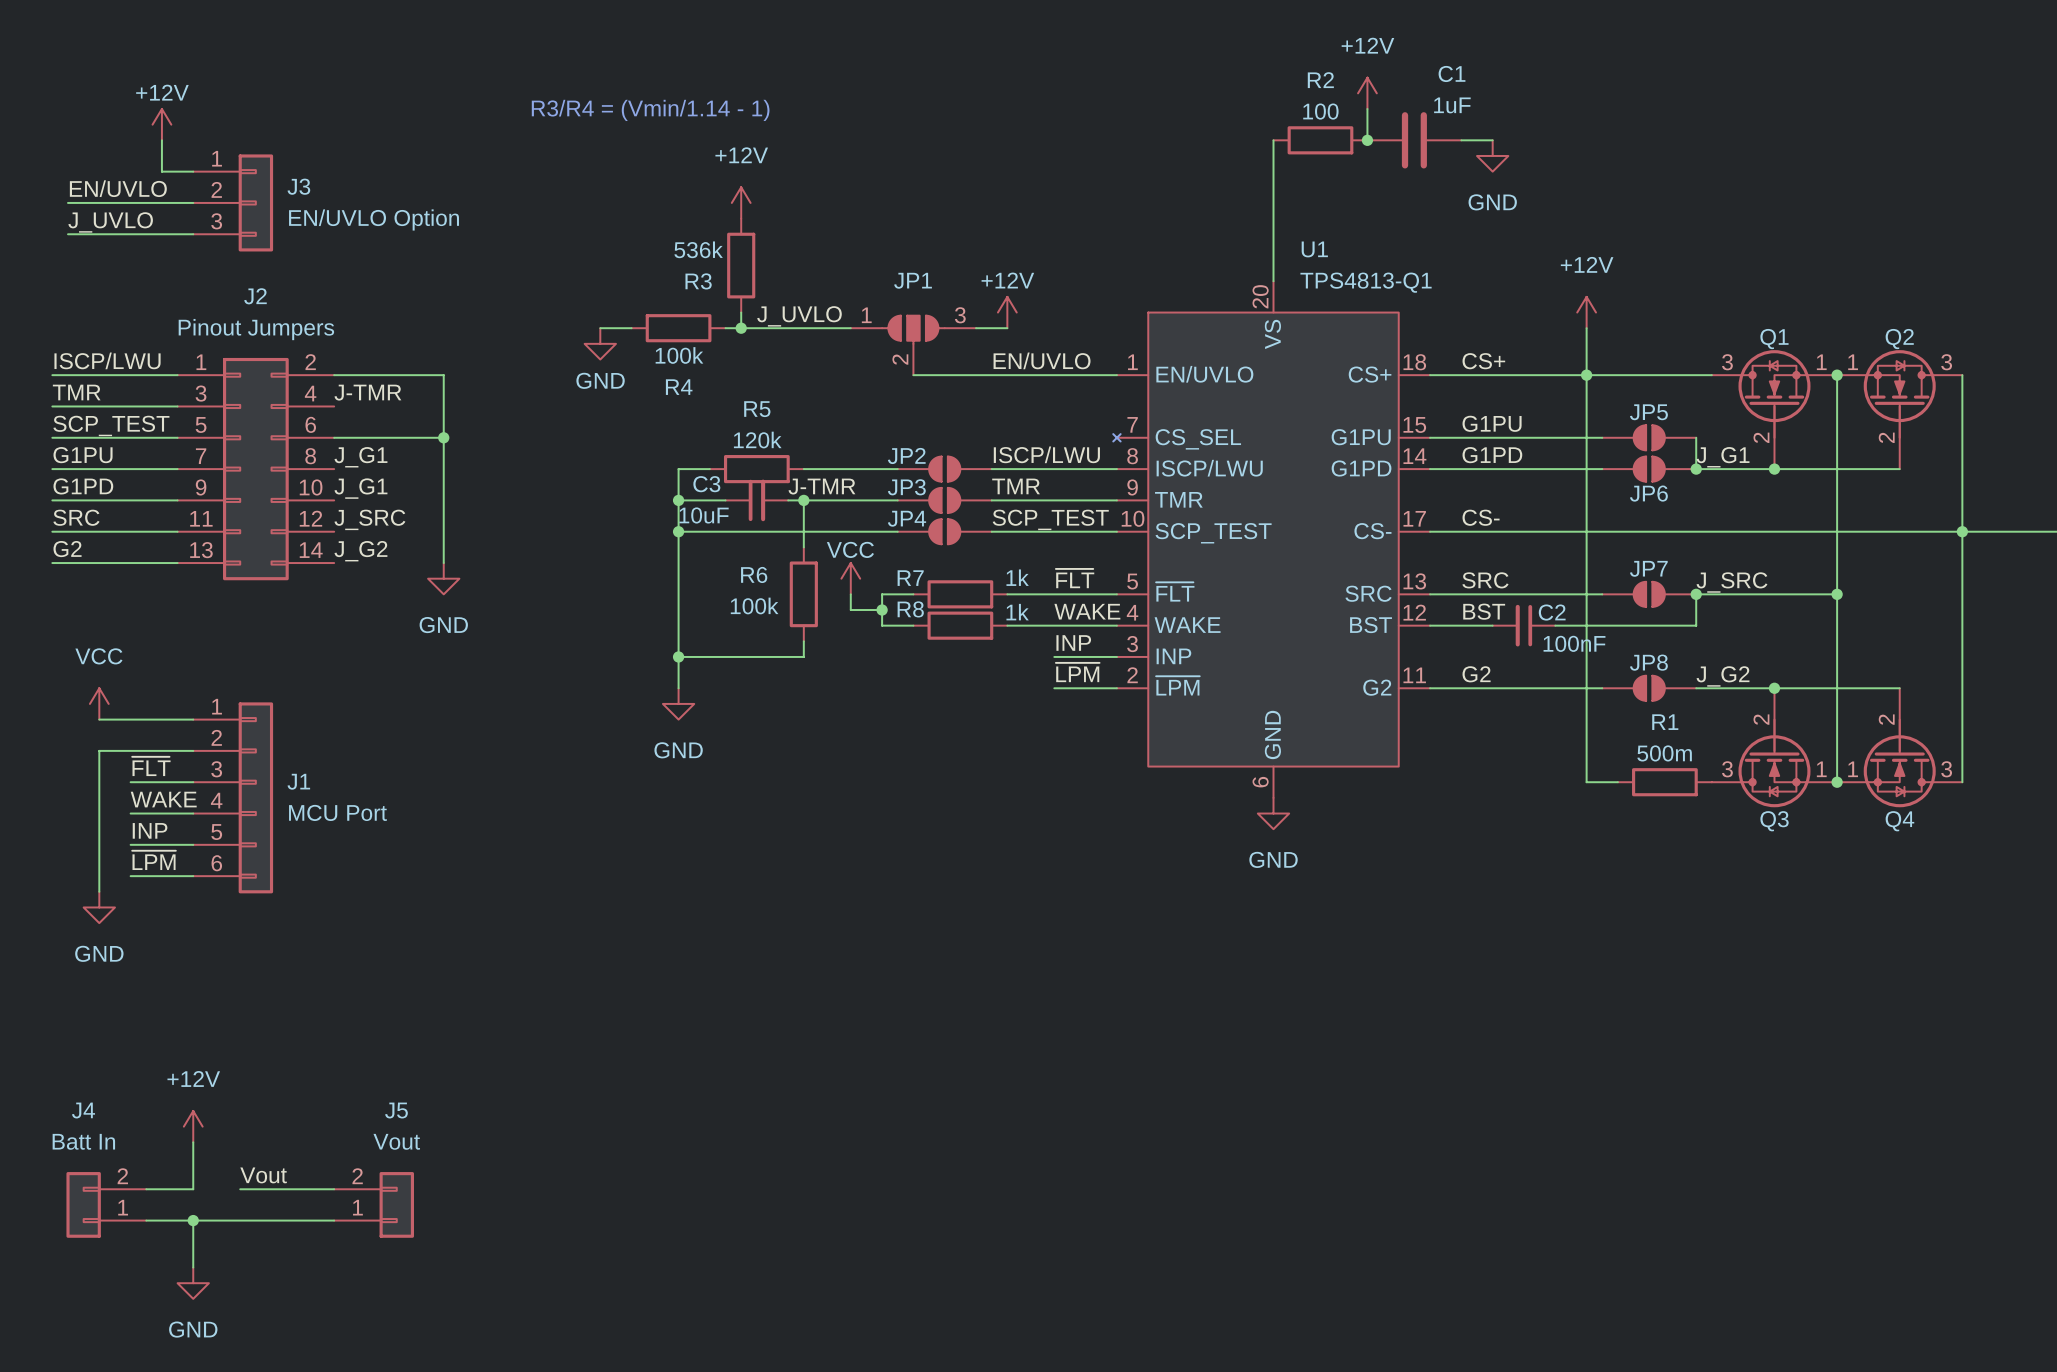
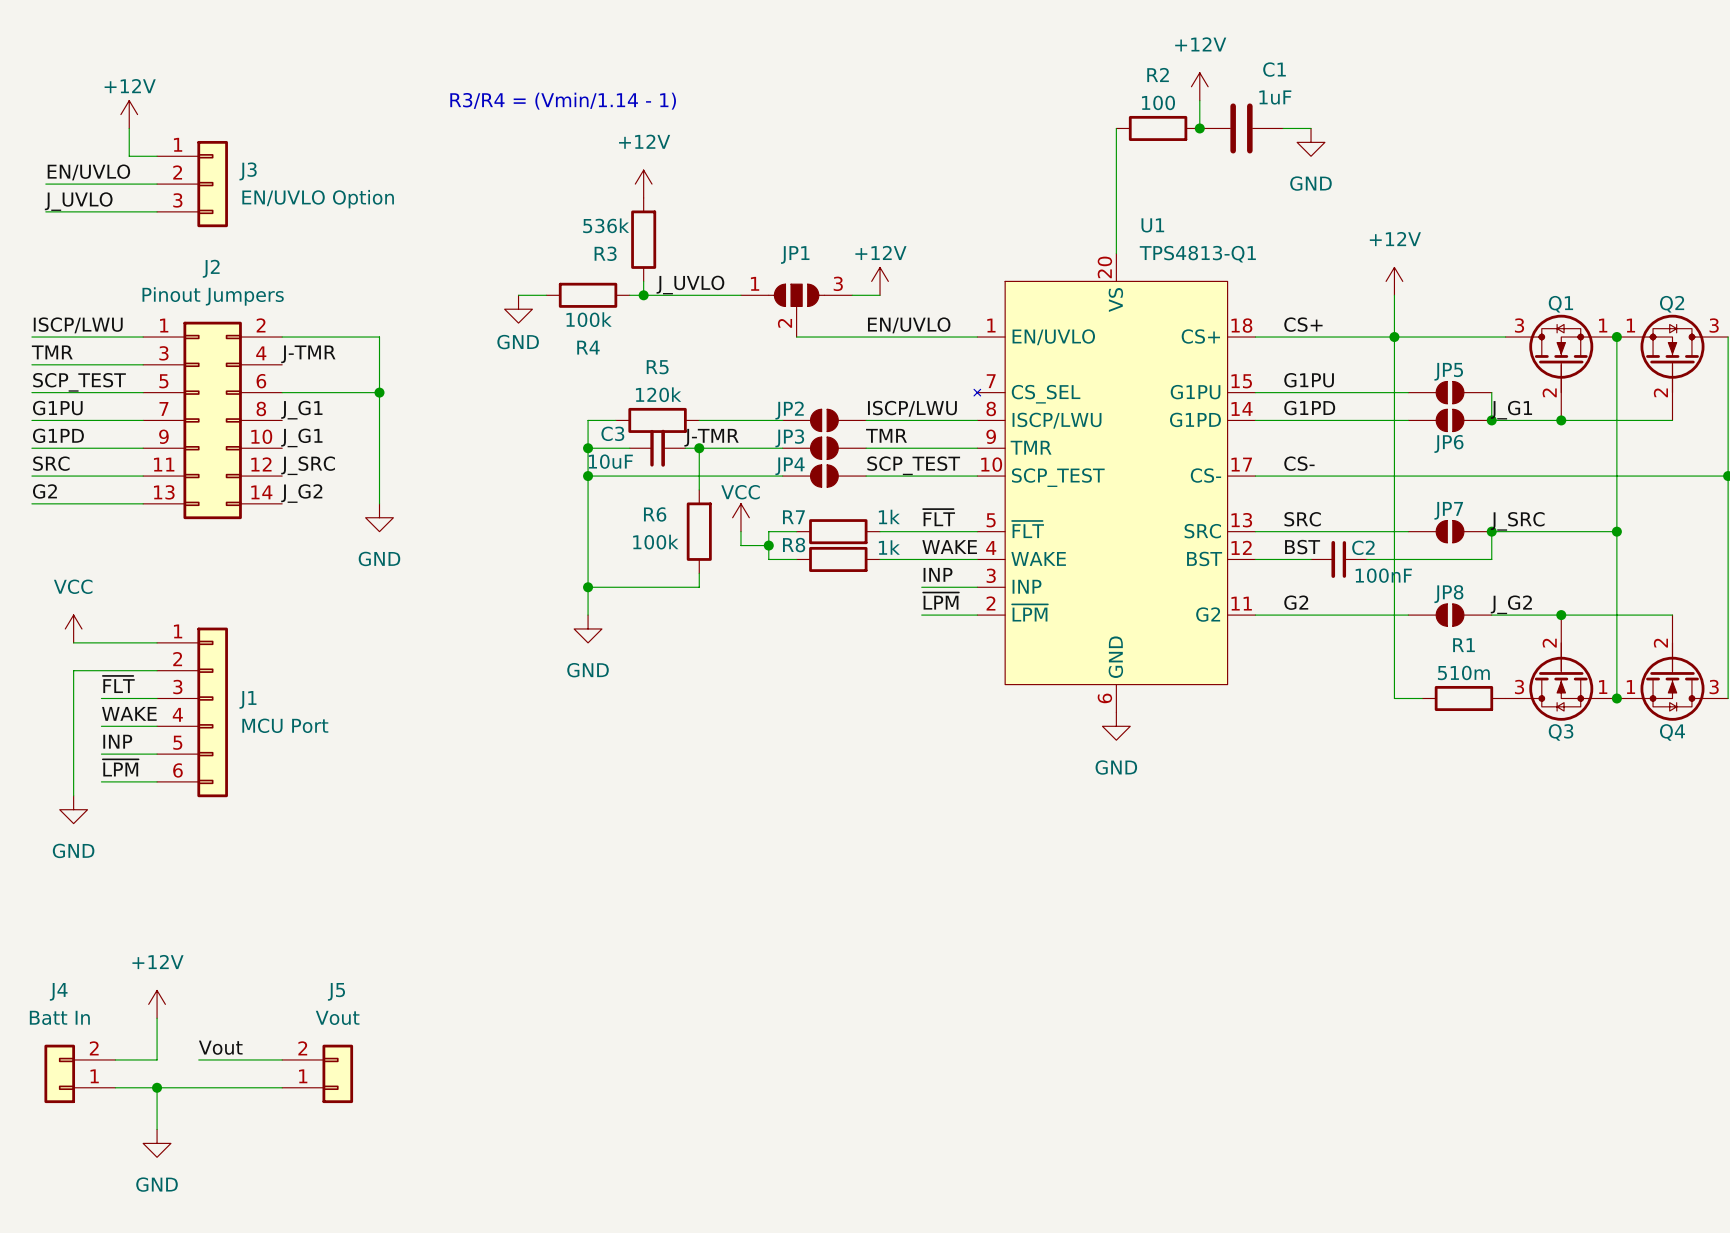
R1 value: 500m (1664, 753) -> 510m (1463, 672)

